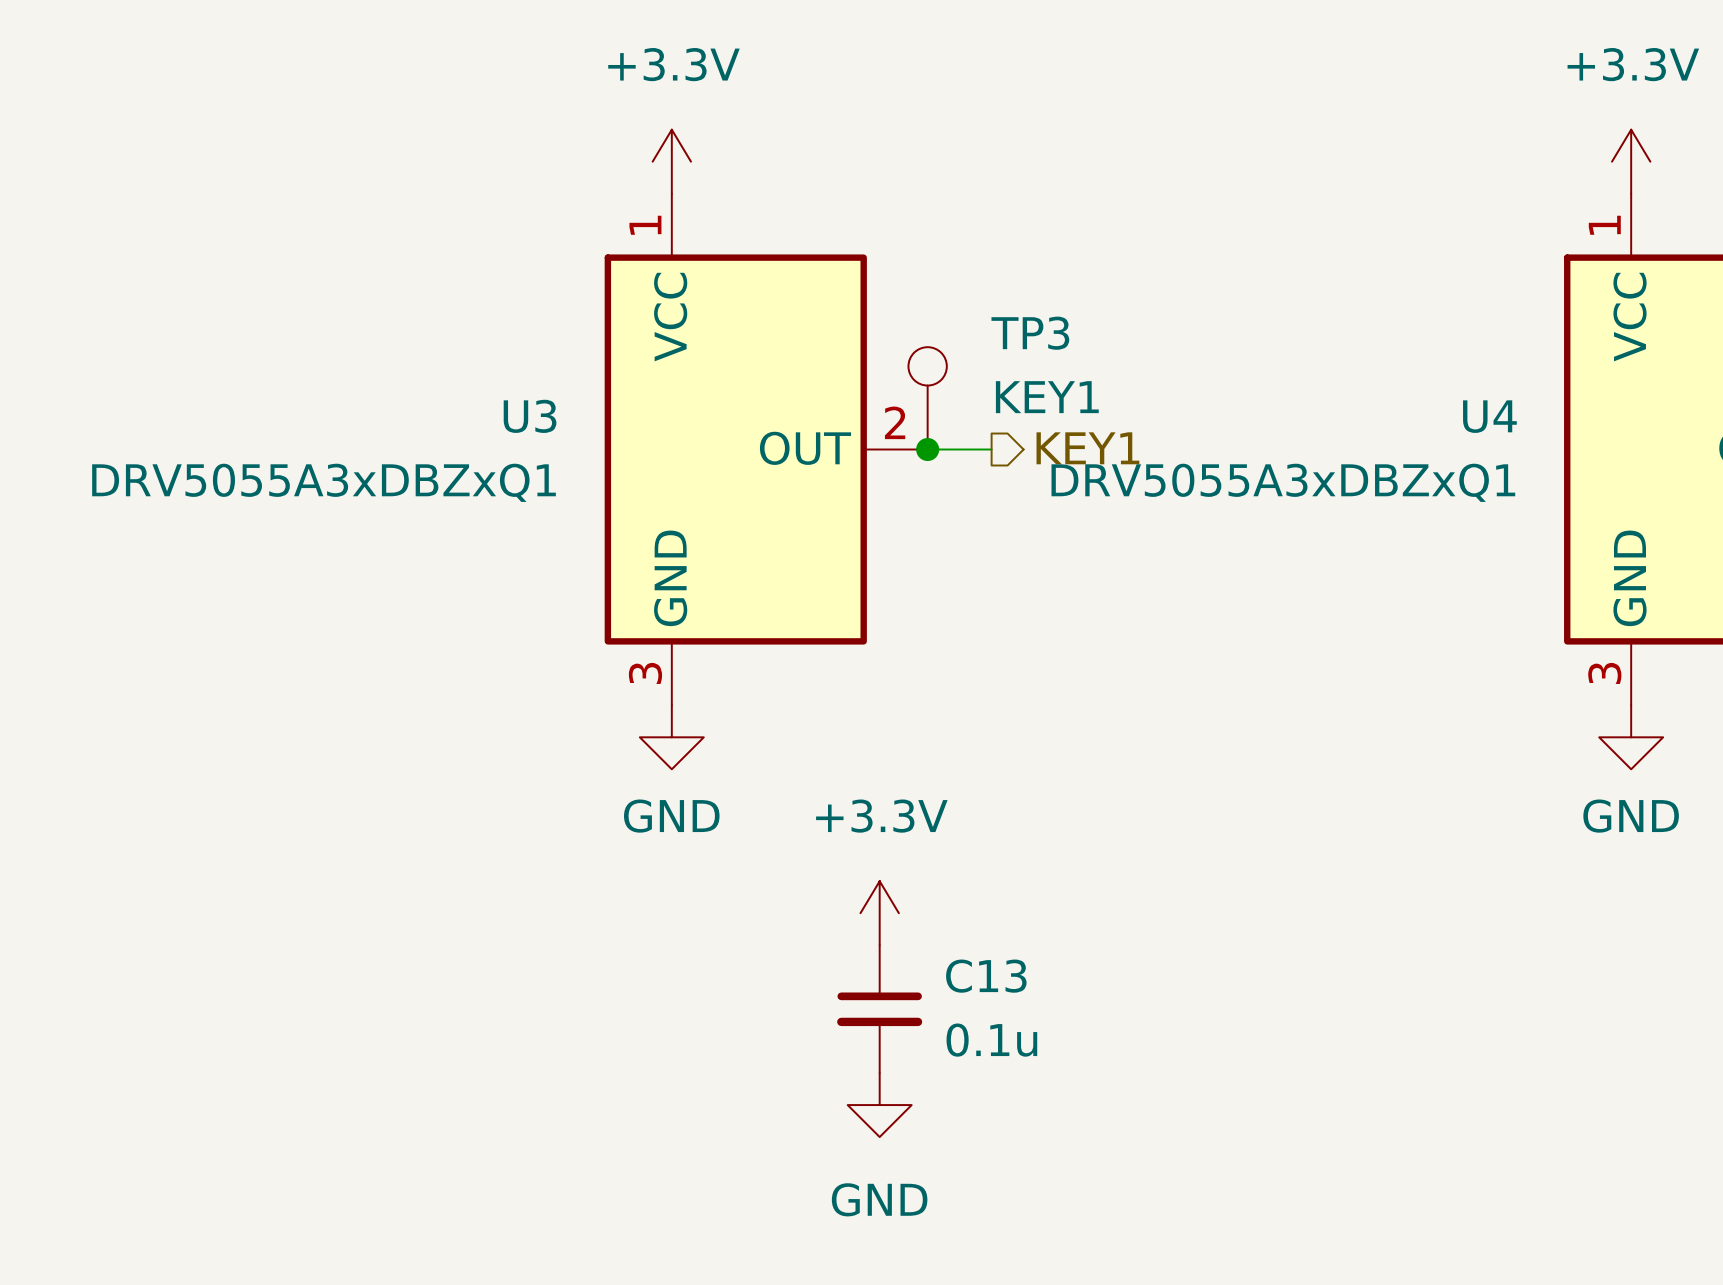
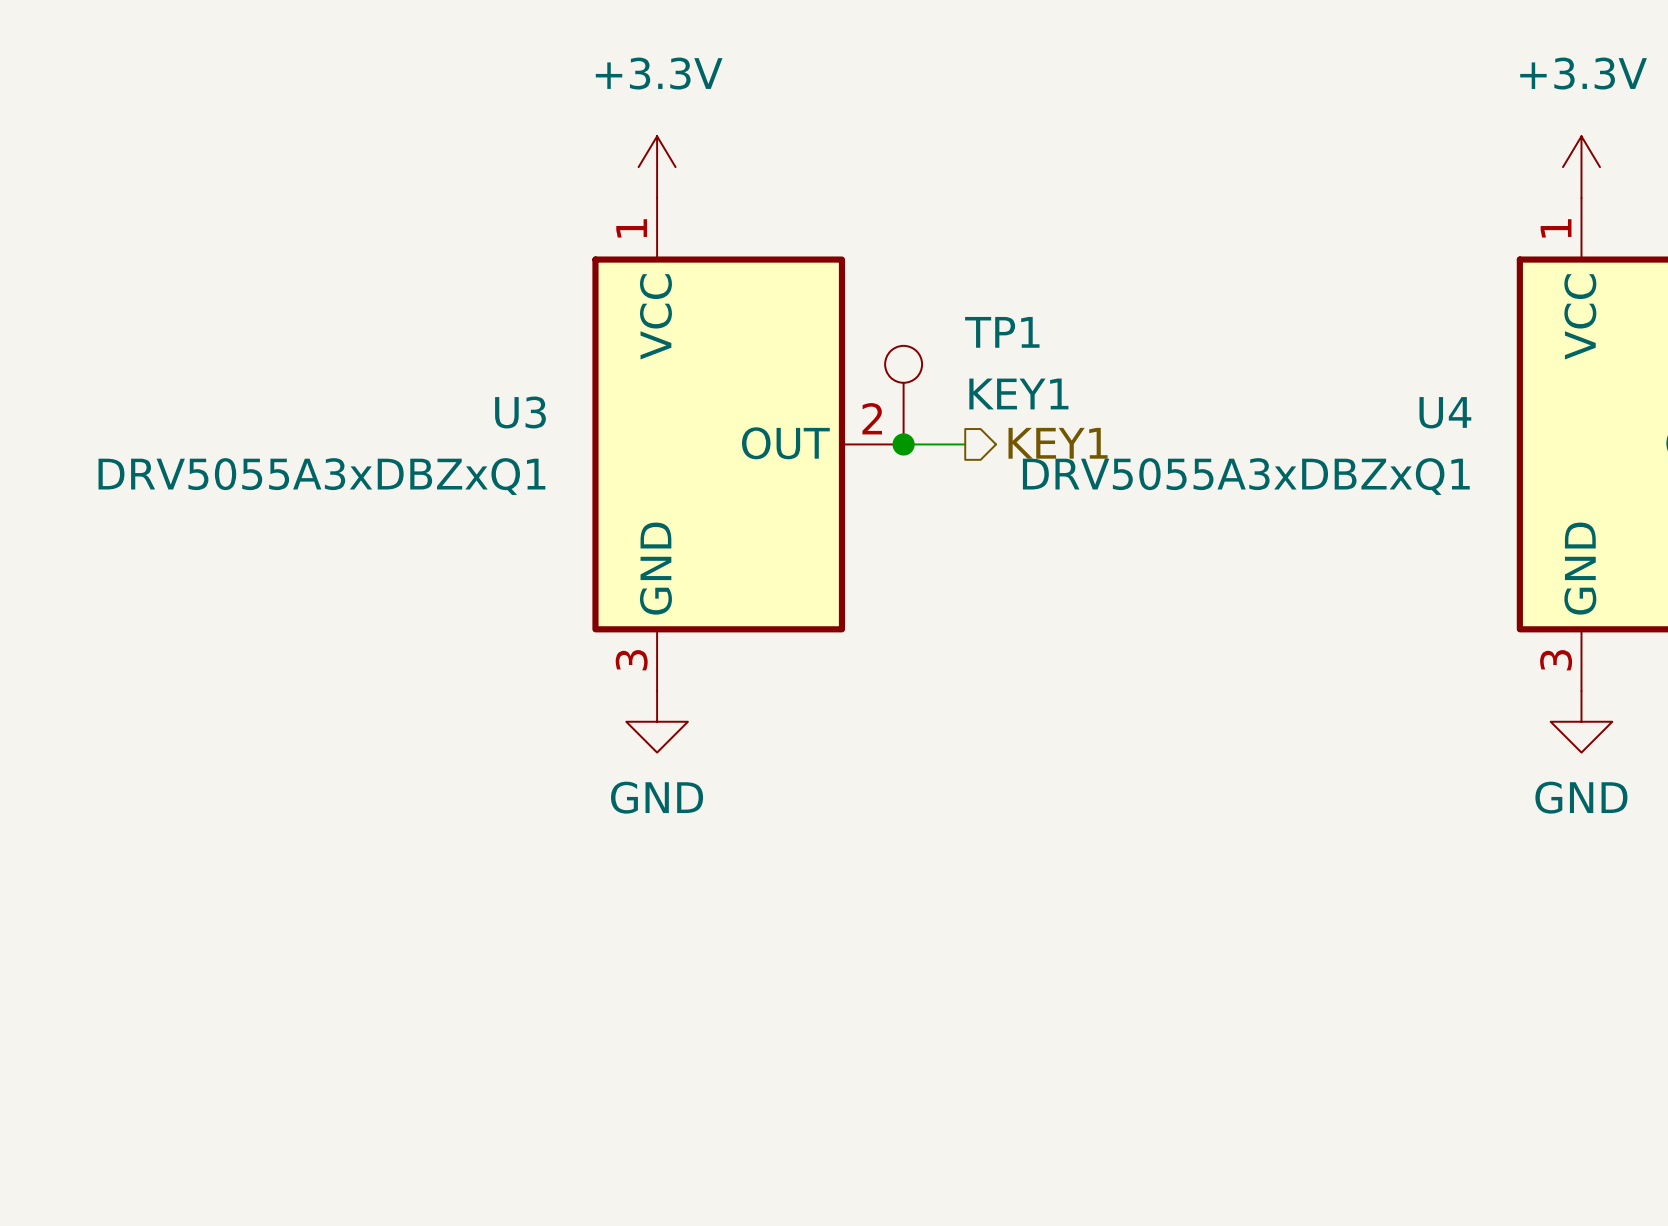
TP3 name: TP3 (1030, 333) -> TP1 (1002, 332)
power symbol: +3.3V (879, 913) -> none
C13: 0.1u (879, 1009) -> none
power symbol: GND (879, 1105) -> none

